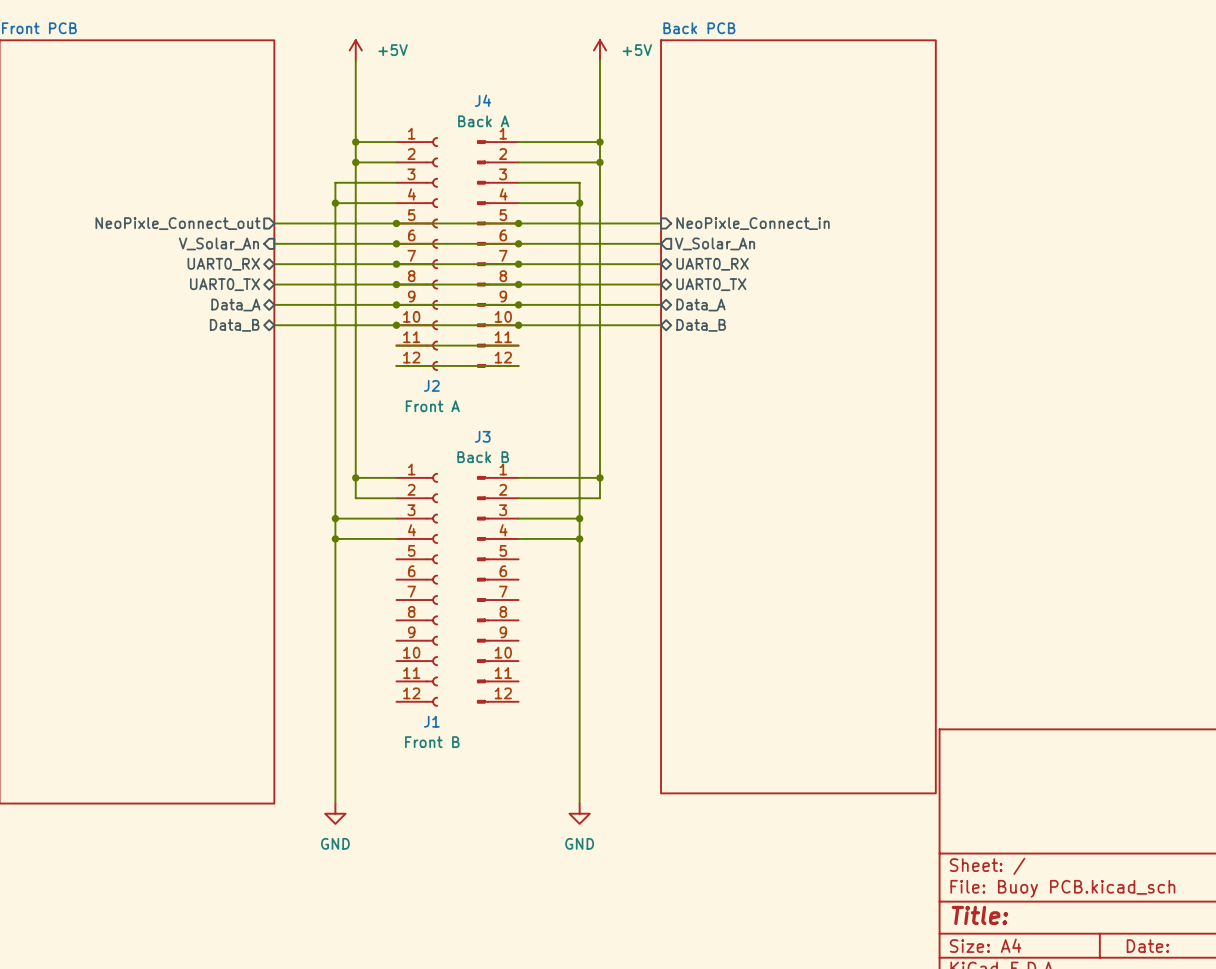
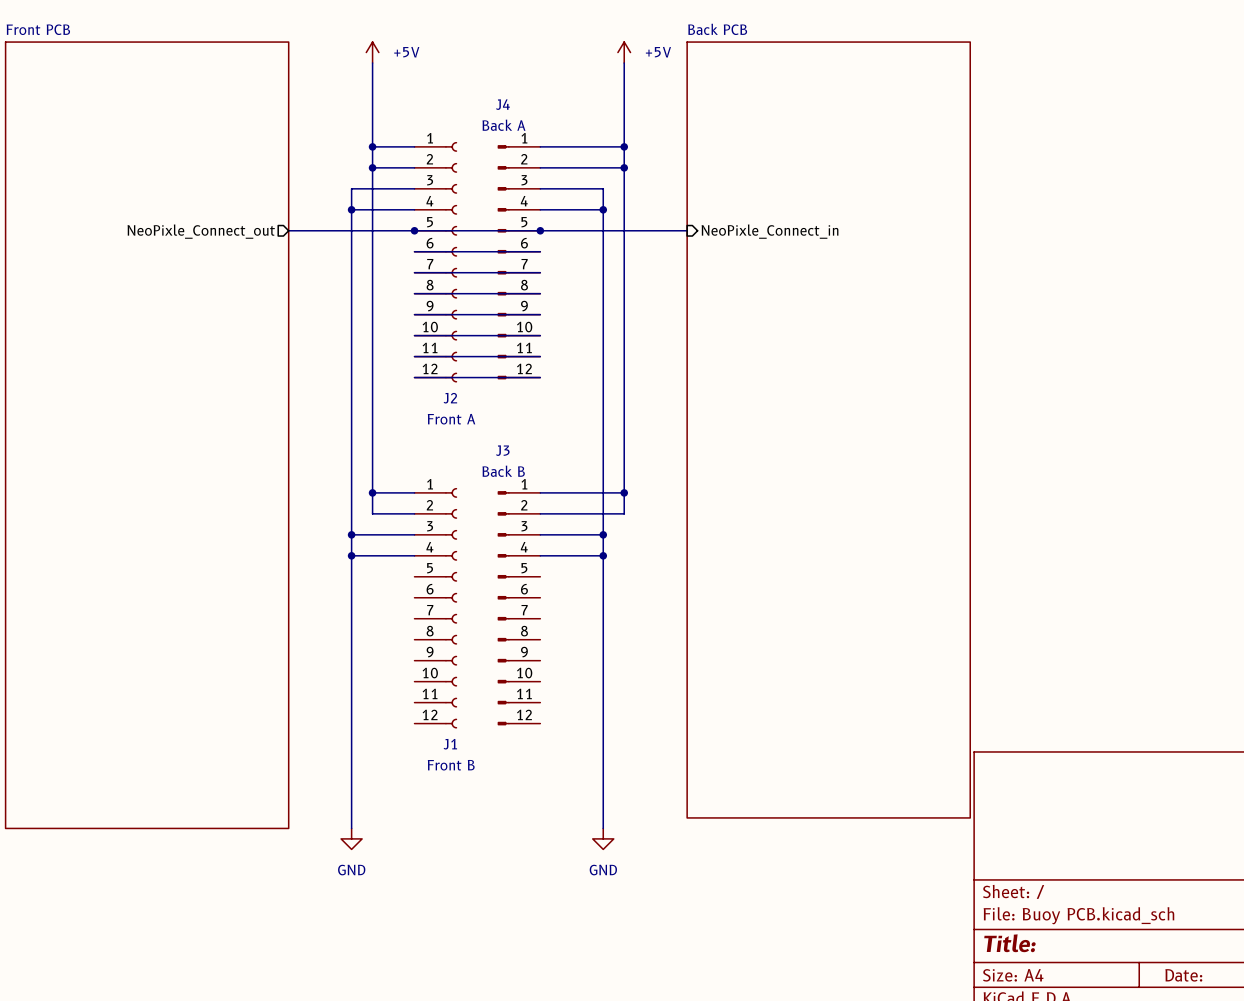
sheet pin: V_Solar_An (218, 243) -> none
wire: (274, 243) (396, 243) -> none
junction: (396, 243) -> none
wire: (518, 243) (661, 243) -> none
junction: (518, 243) -> none
sheet pin: V_Solar_An (715, 243) -> none
sheet pin: UART0_RX (223, 264) -> none
wire: (274, 264) (396, 264) -> none
junction: (396, 264) -> none
wire: (518, 264) (661, 264) -> none
junction: (518, 264) -> none
sheet pin: UART0_RX (712, 264) -> none
sheet pin: UART0_TX (224, 284) -> none
wire: (274, 284) (396, 284) -> none
junction: (396, 284) -> none
wire: (518, 284) (661, 284) -> none
junction: (518, 284) -> none
sheet pin: UART0_TX (711, 284) -> none
wire: (274, 304) (396, 304) -> none
junction: (396, 304) -> none
wire: (518, 304) (661, 304) -> none
junction: (518, 304) -> none
sheet pin: Data_A (235, 305) -> none
sheet pin: Data_A (700, 305) -> none
sheet pin: Data_B (234, 325) -> none
wire: (274, 325) (396, 325) -> none
junction: (396, 325) -> none
wire: (518, 325) (661, 325) -> none
junction: (518, 325) -> none
sheet pin: Data_B (701, 325) -> none

